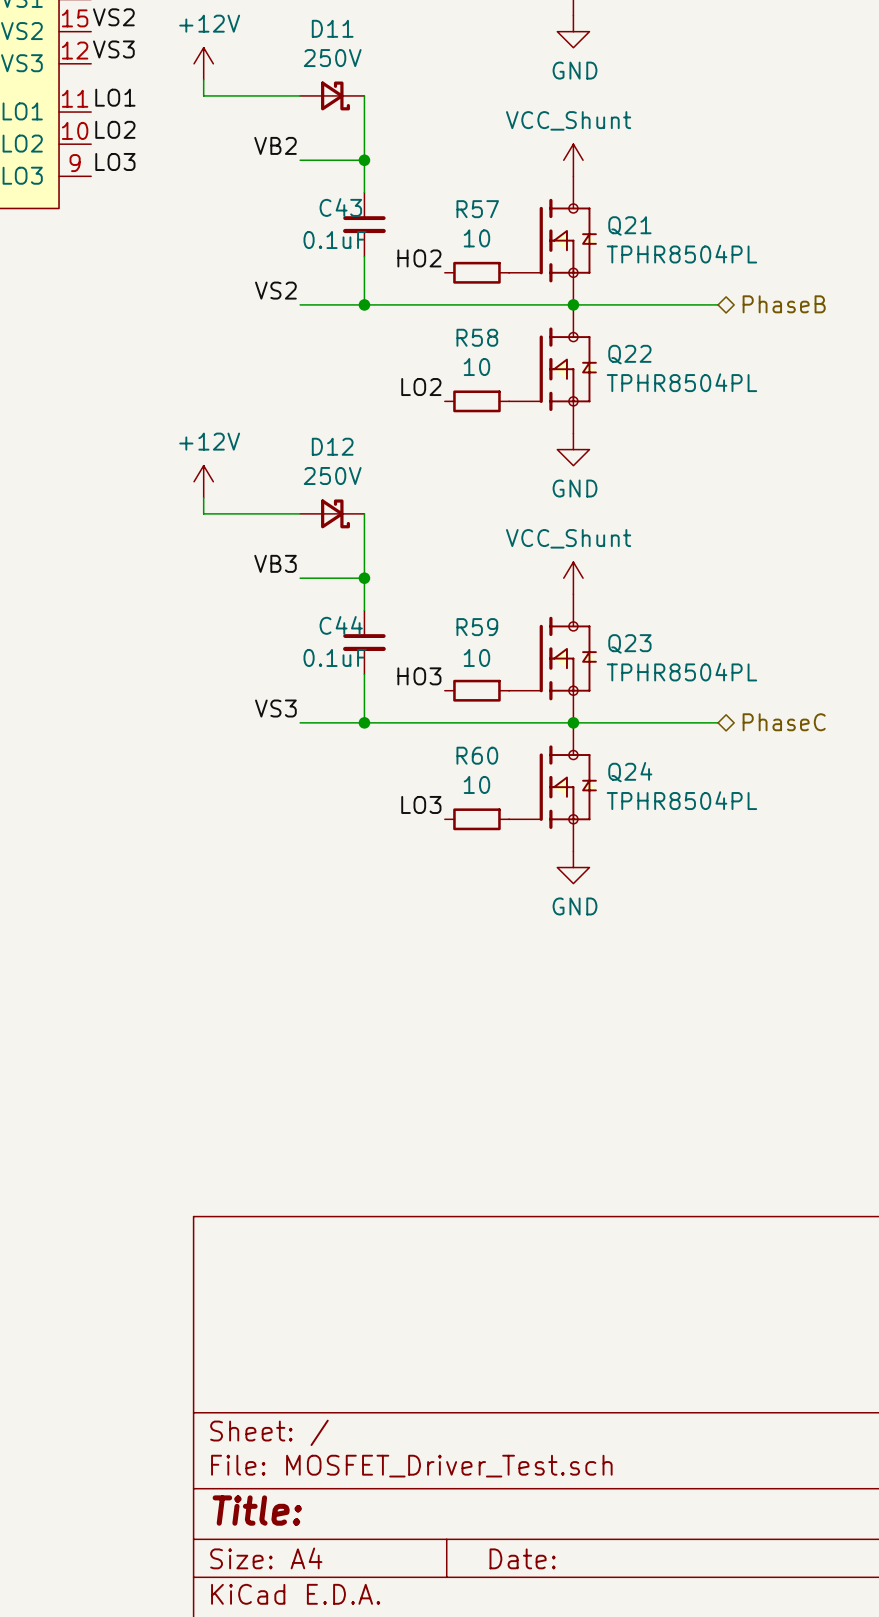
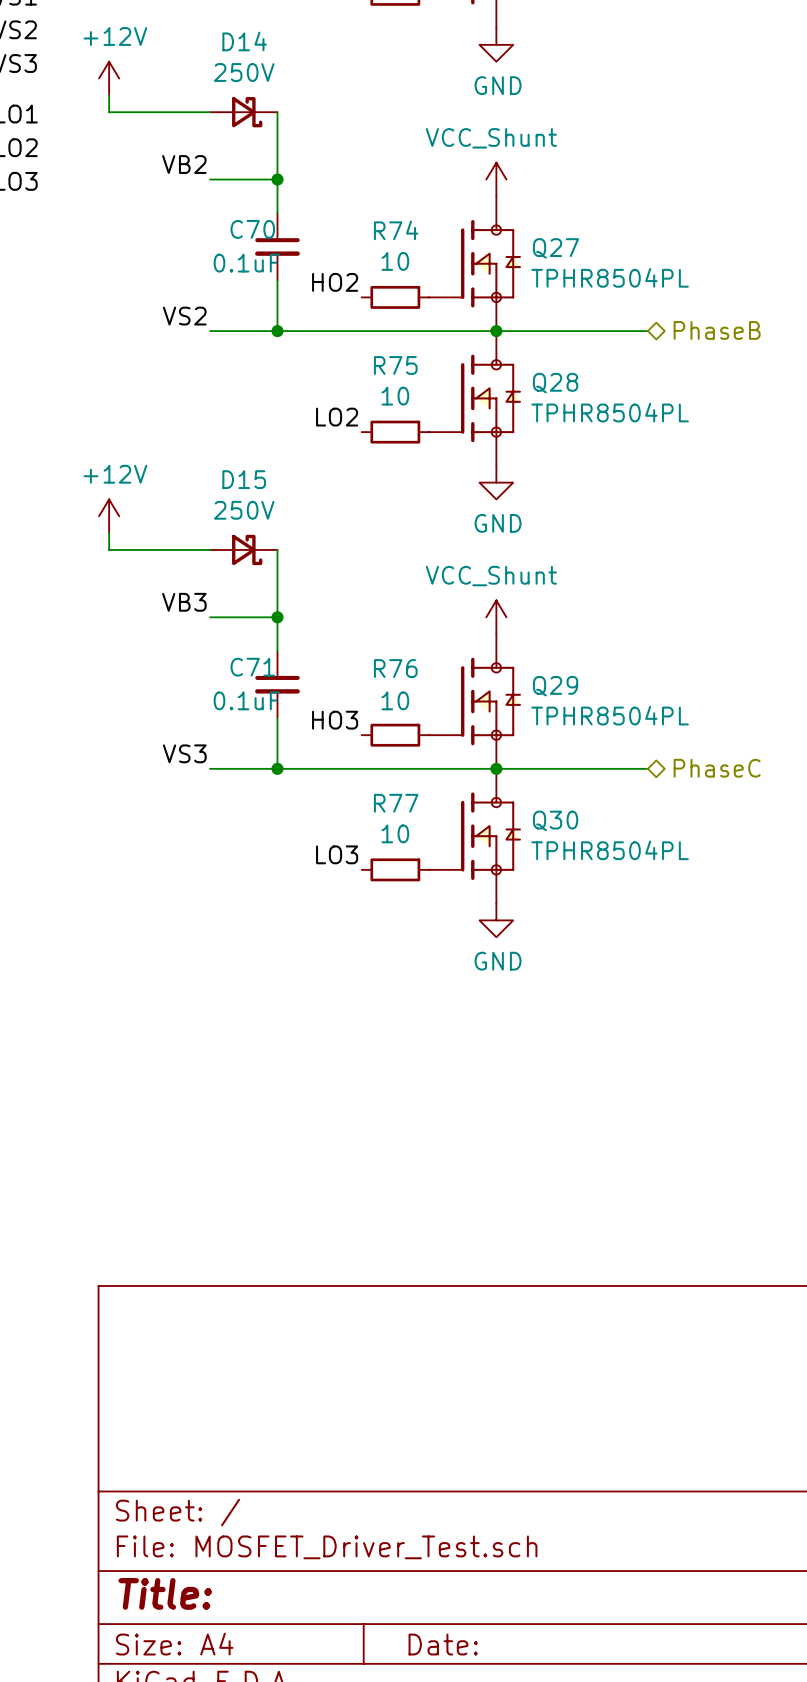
D11 name: D11 (332, 28) -> D14 (244, 41)
C43 name: C43 (340, 207) -> C70 (252, 229)
R57 name: R57 (477, 209) -> R74 (396, 230)
Q21 name: Q21 (629, 226) -> Q27 (555, 248)
R58 name: R58 (477, 337) -> R75 (395, 365)
Q22 name: Q22 (629, 354) -> Q28 (555, 383)
D12 name: D12 (332, 446) -> D15 (244, 479)
C44 name: C44 (341, 625) -> C71 (252, 667)
R59 name: R59 (477, 627) -> R76 (395, 668)
Q23 name: Q23 (629, 643) -> Q29 (555, 686)
R60 name: R60 (477, 755) -> R77 (396, 803)
Q24 name: Q24 (630, 772) -> Q30 (555, 820)

